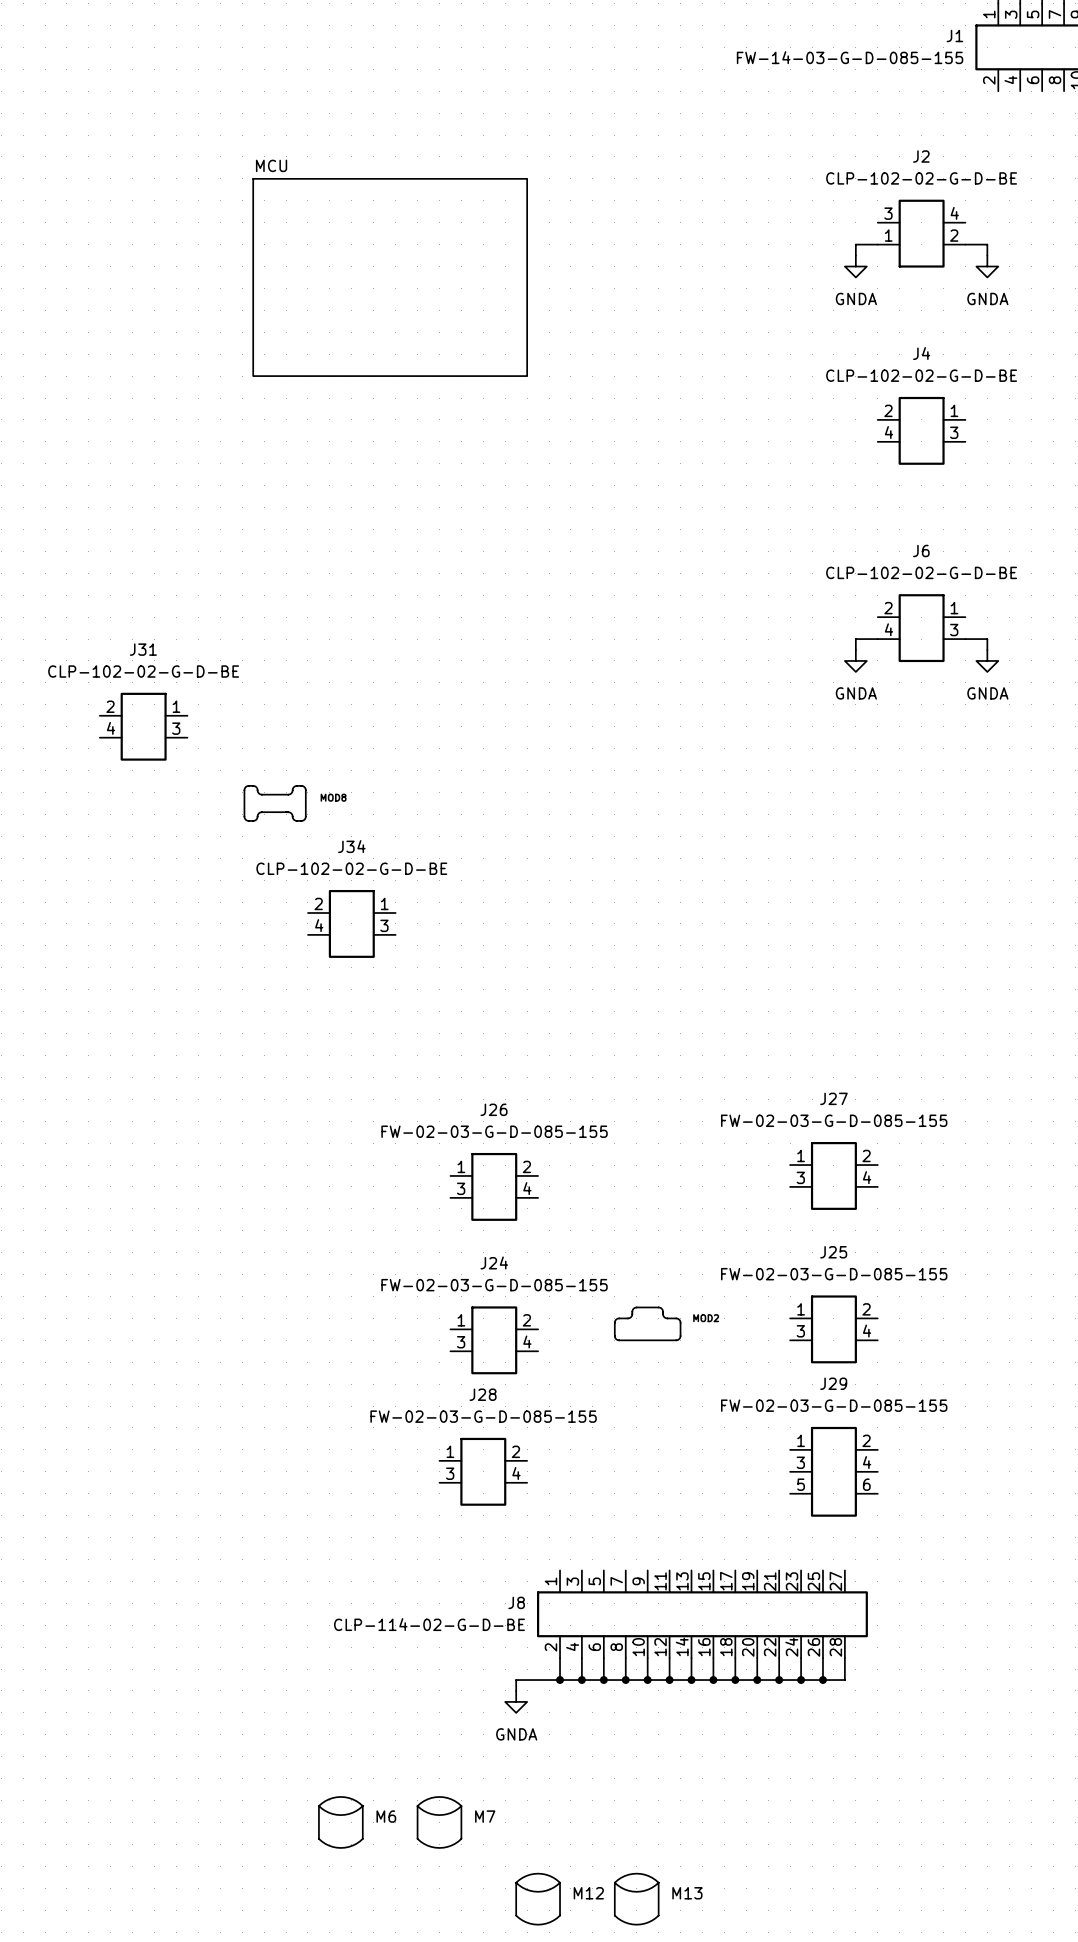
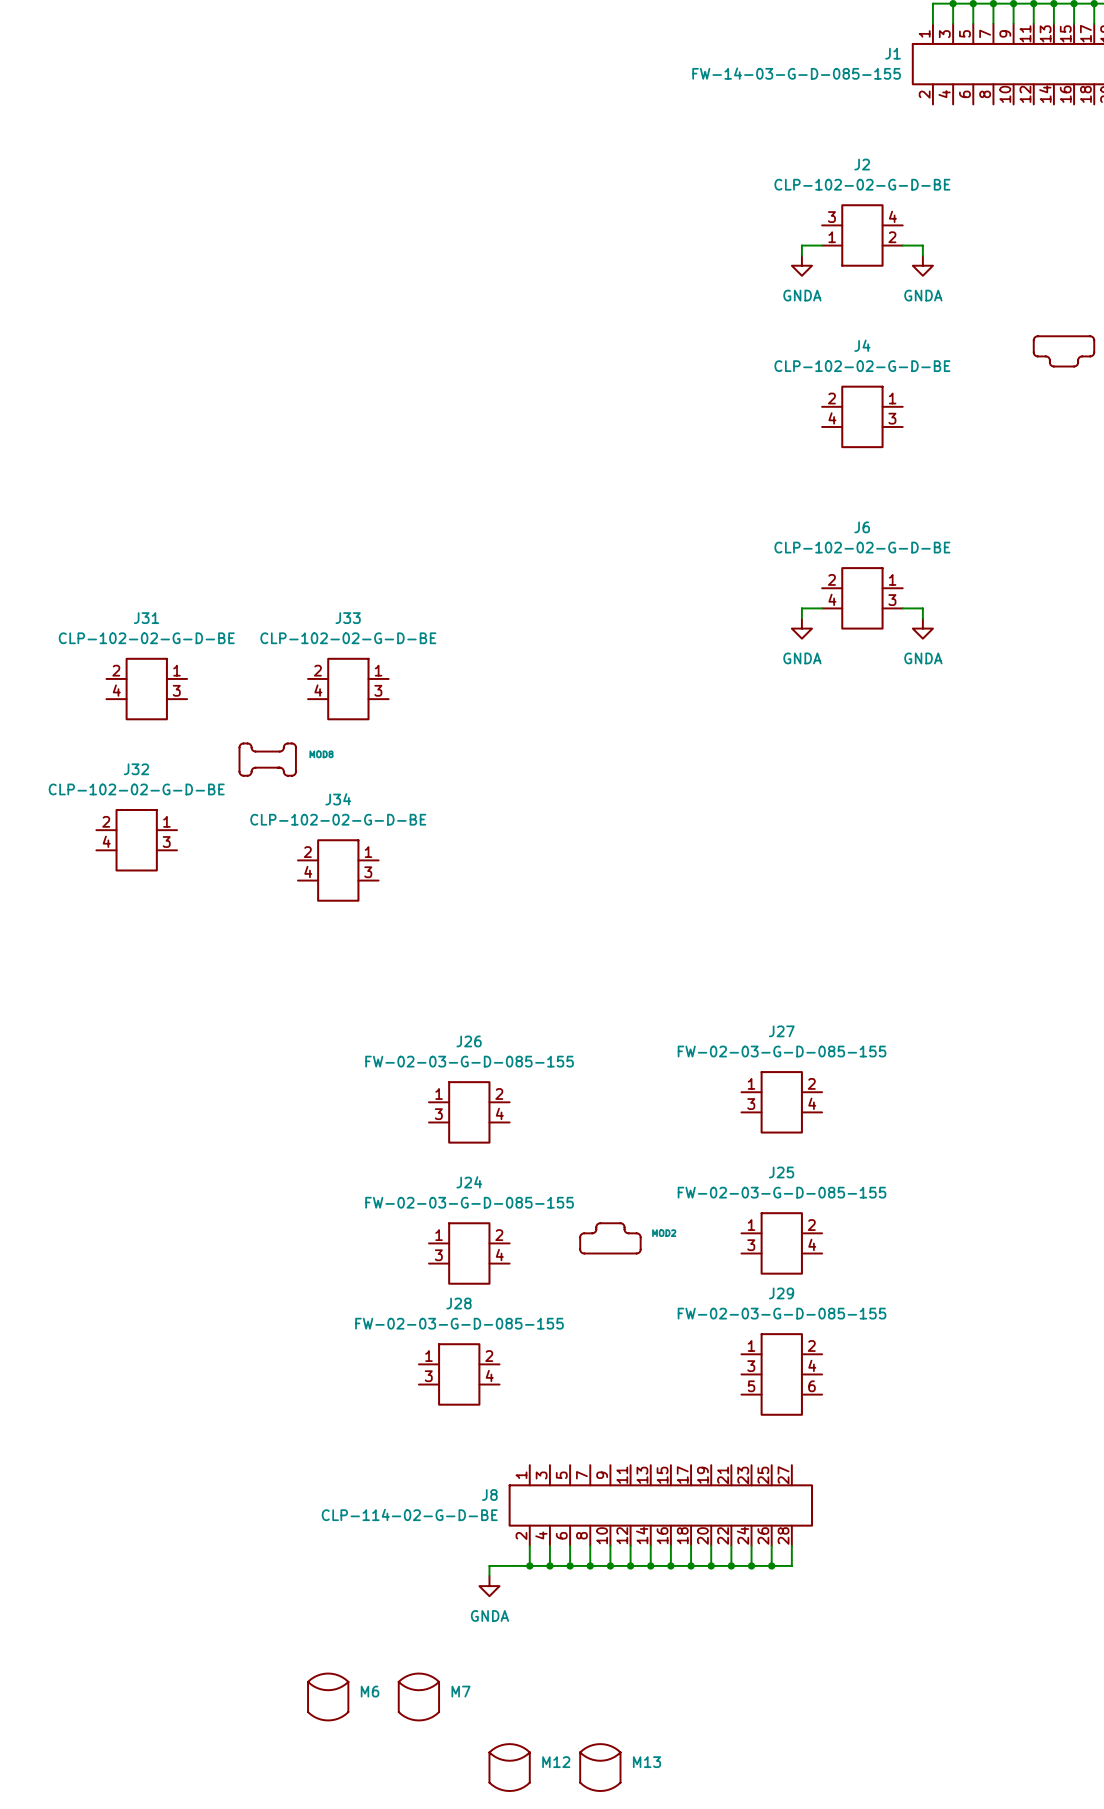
sheet MCU: (390, 277) -> none
J33: none -> CLP-102-02-G-D-BE (348, 689)
J32: none -> CLP-102-02-G-D-BE (136, 840)

